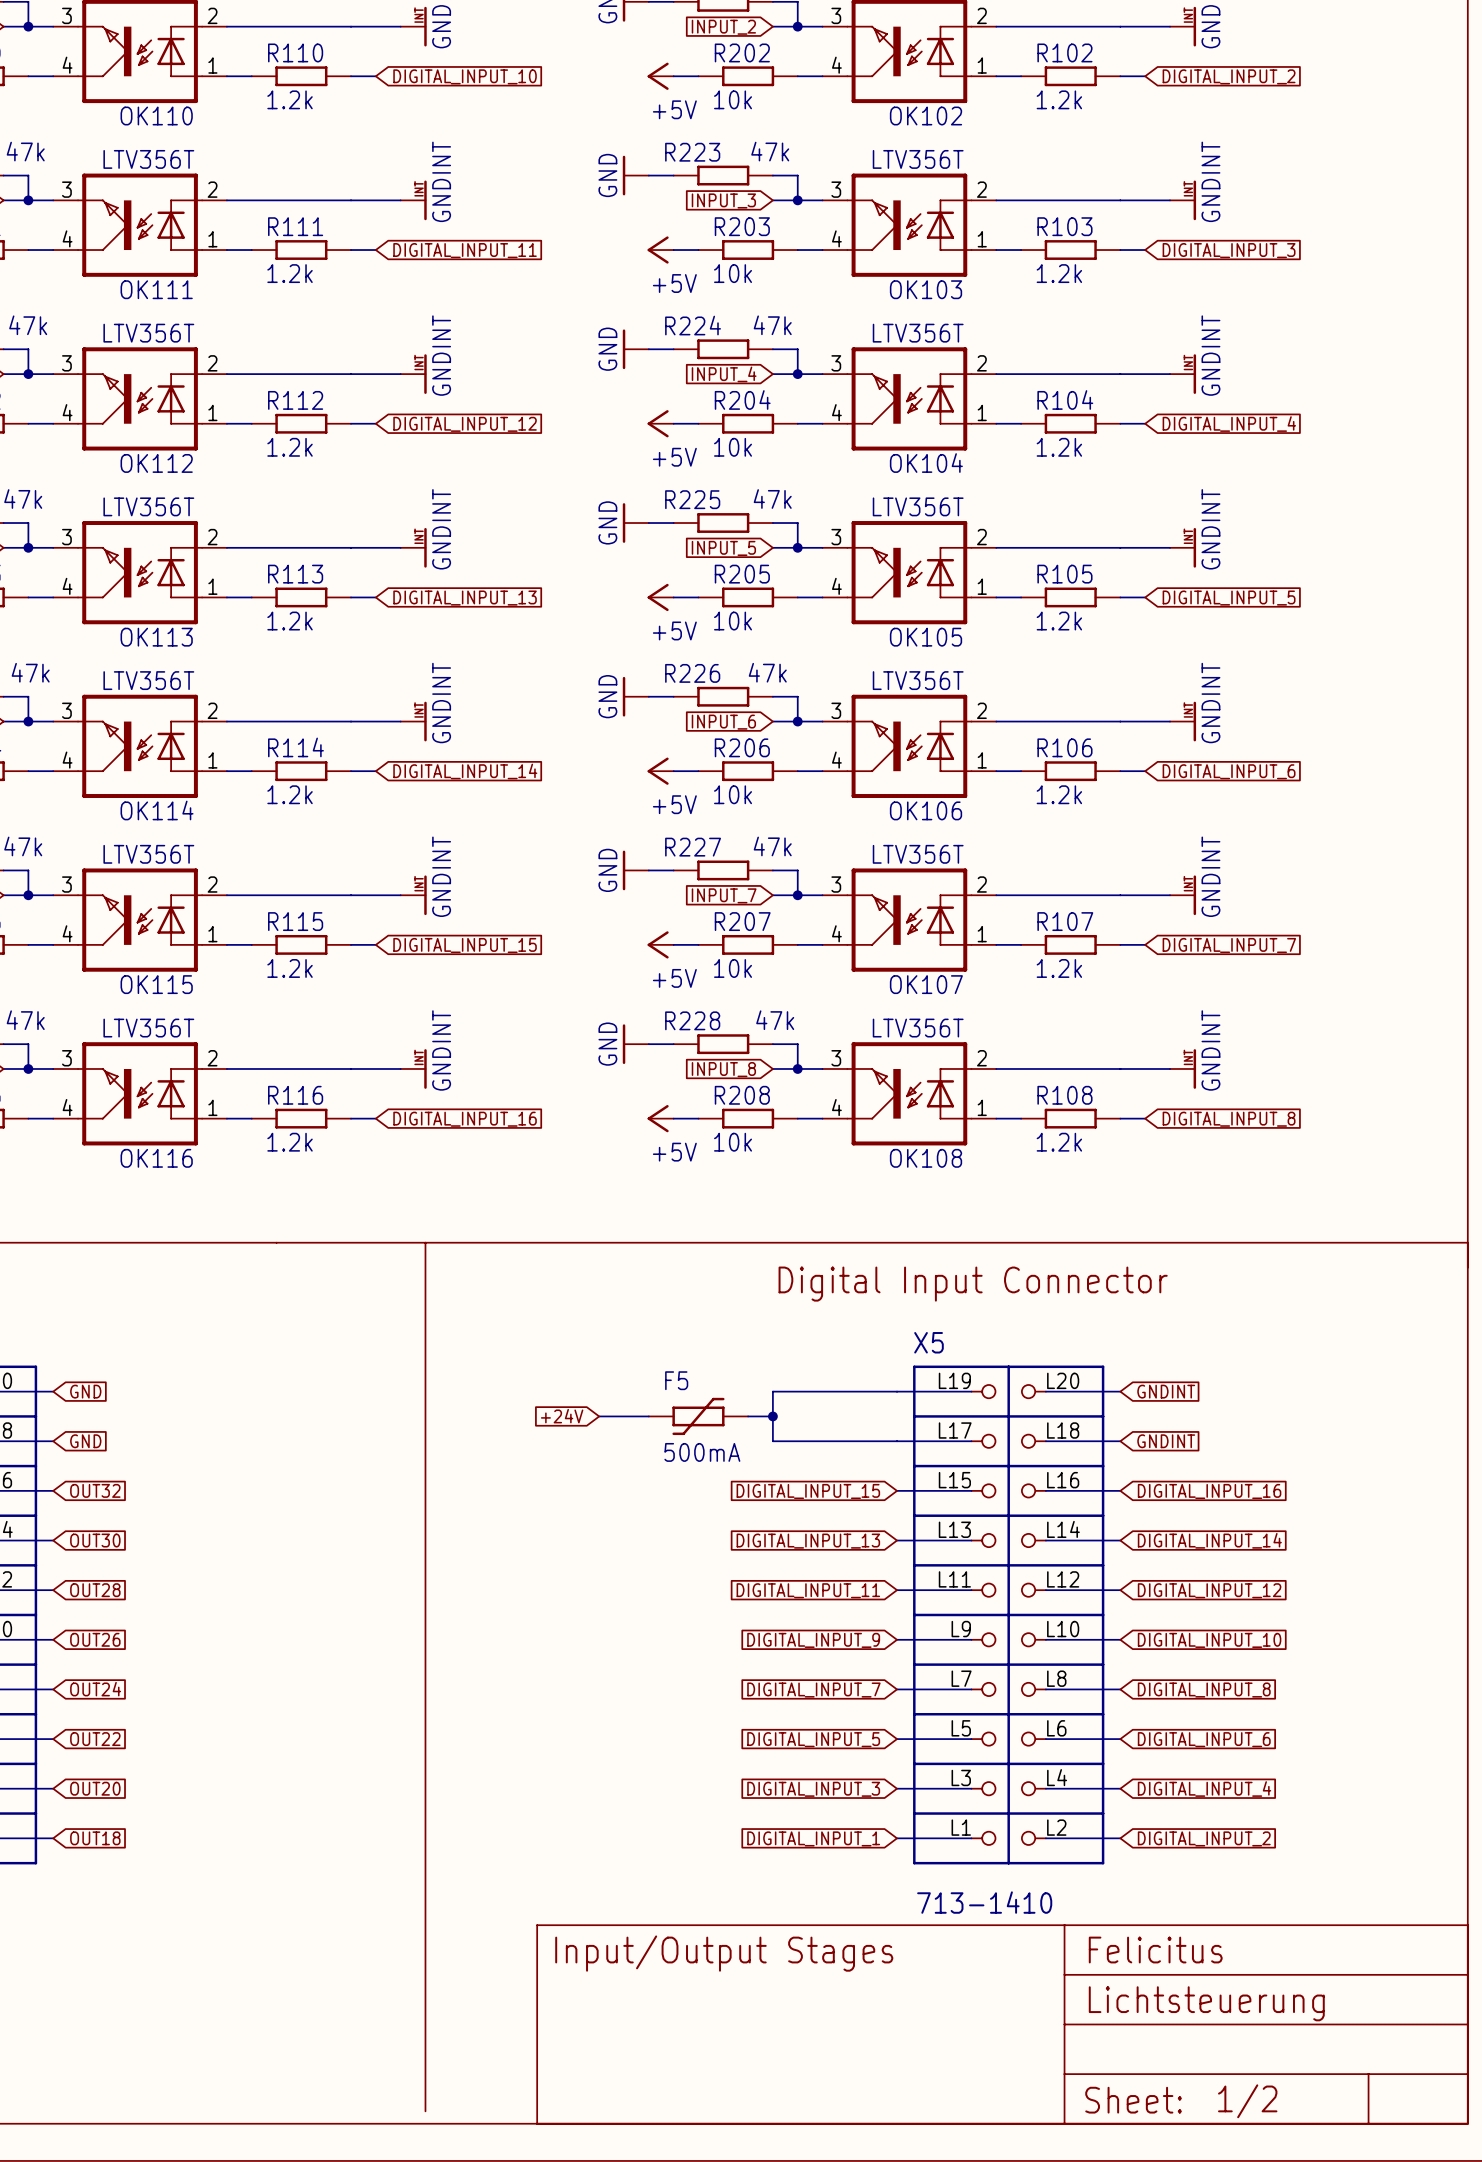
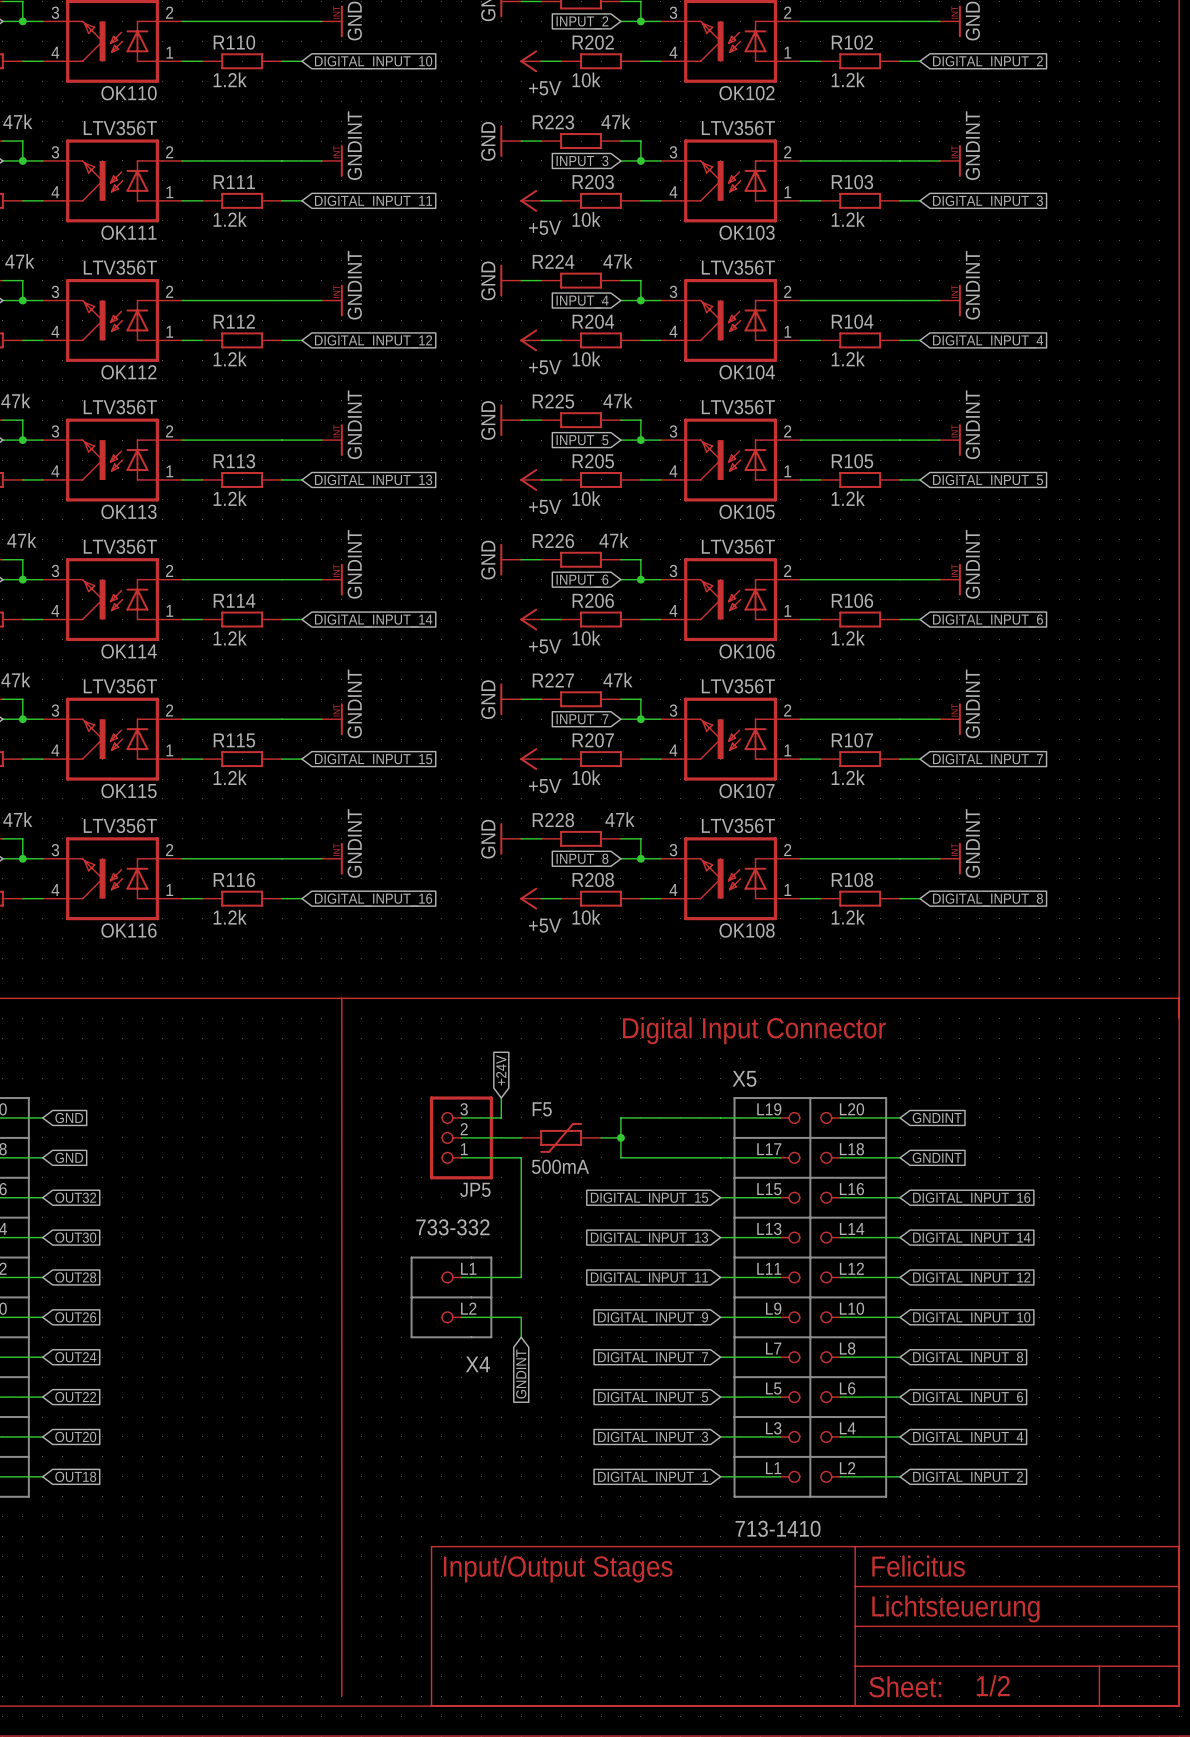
wire: none -> (501, 1098) (501, 1117) (461, 1117)
global label rotation: 0° (562, 1416) -> 90° clockwise (501, 1070)
global label position: +24V (562, 1416) -> +24V (501, 1070)
wire: none -> (461, 1137) (481, 1137)
JP5: none -> (461, 1137)
wire: none -> (461, 1157) (521, 1157) (521, 1277) (461, 1277)
X4: none -> 733-332 (451, 1297)
wire: none -> (461, 1317) (521, 1317) (521, 1337)
global label: none -> GNDINT (521, 1374)

